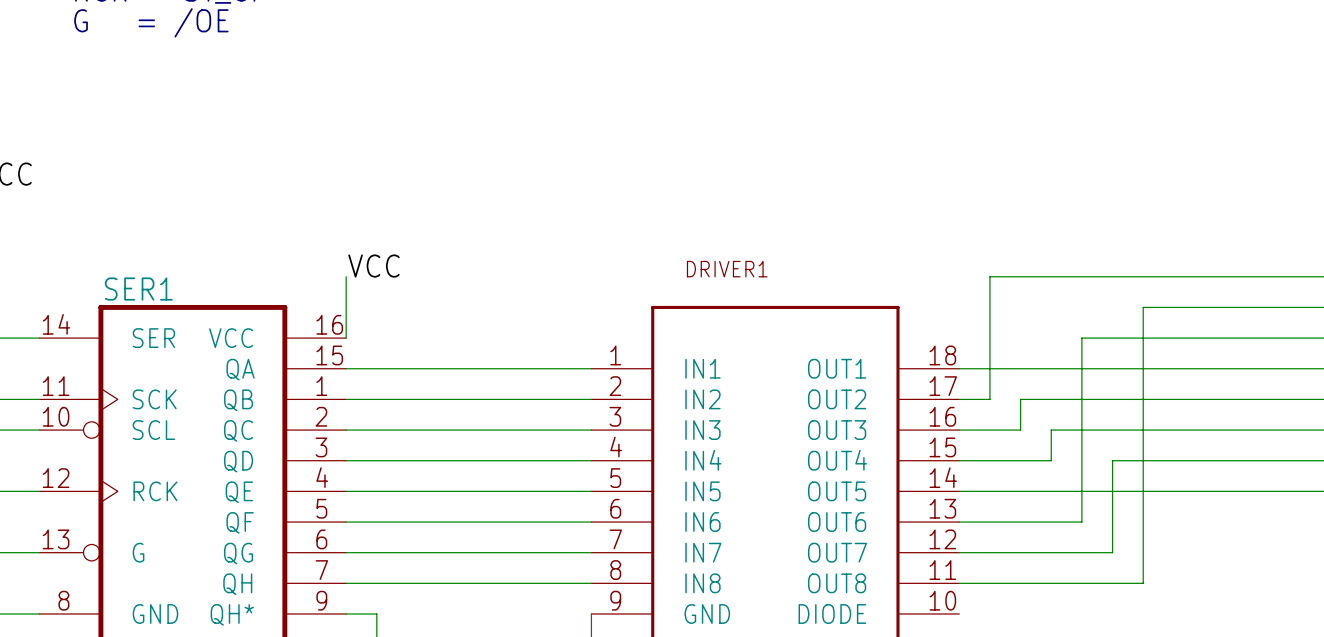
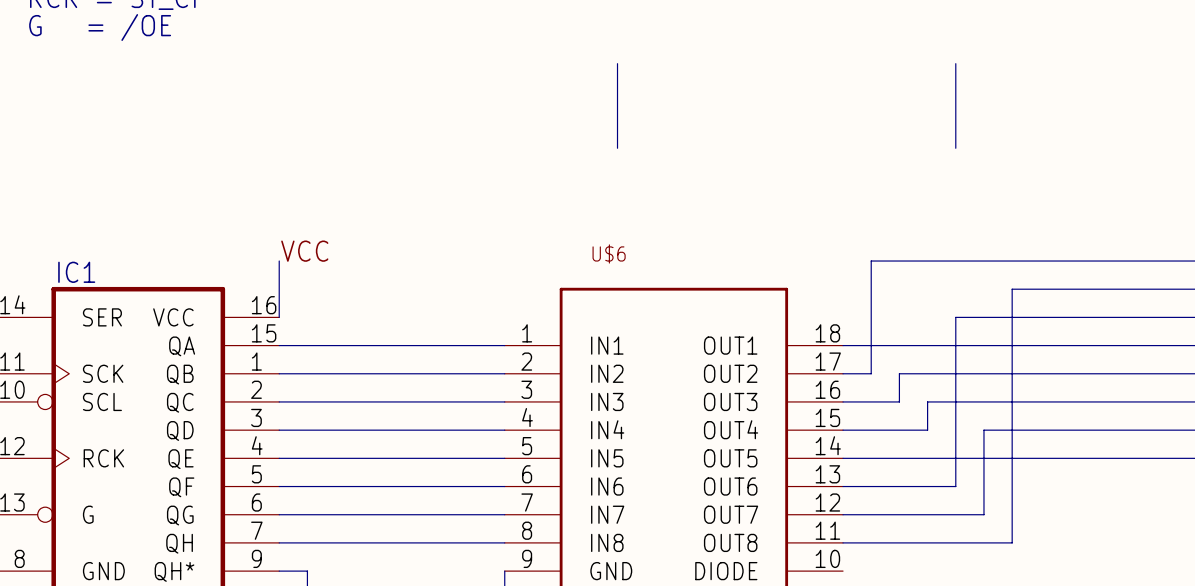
wire: none -> (617, 63) (617, 148)
wire: none -> (955, 63) (955, 148)
DRIVER1 name: DRIVER1 (727, 269) -> U$6 (609, 253)
SER1 name: SER1 (138, 289) -> IC1 (76, 272)

